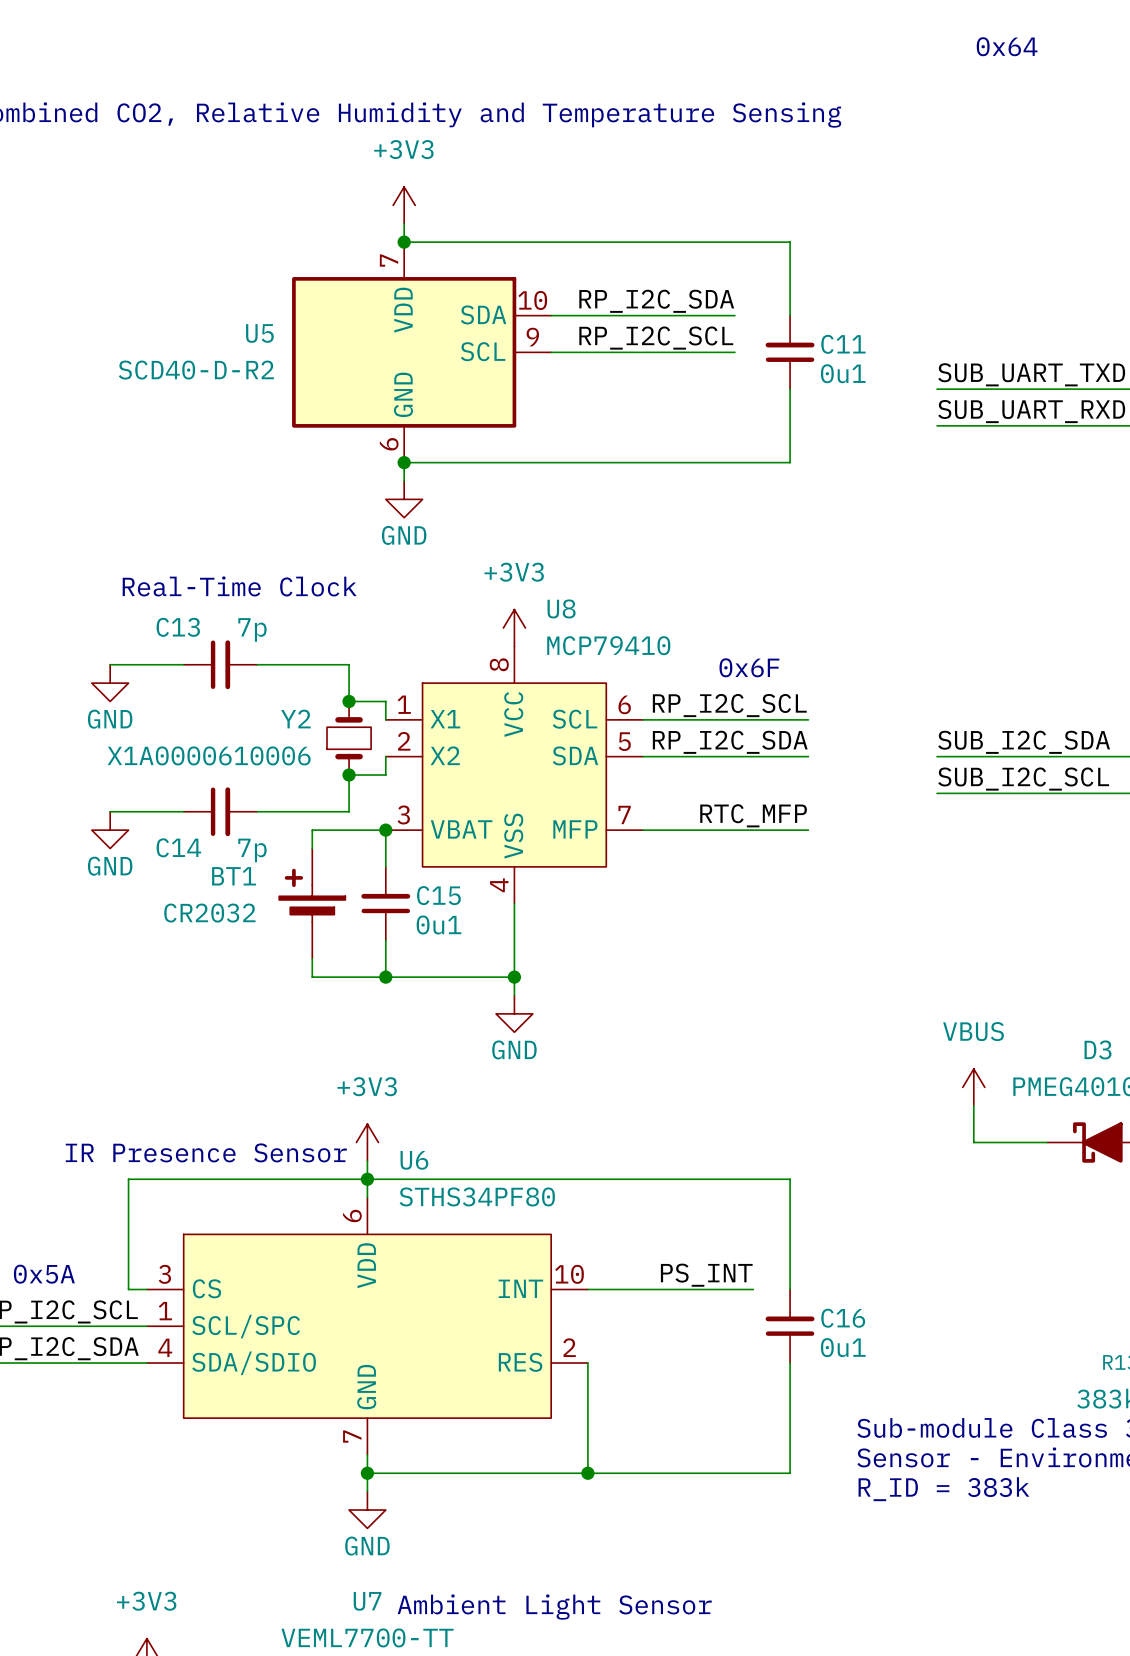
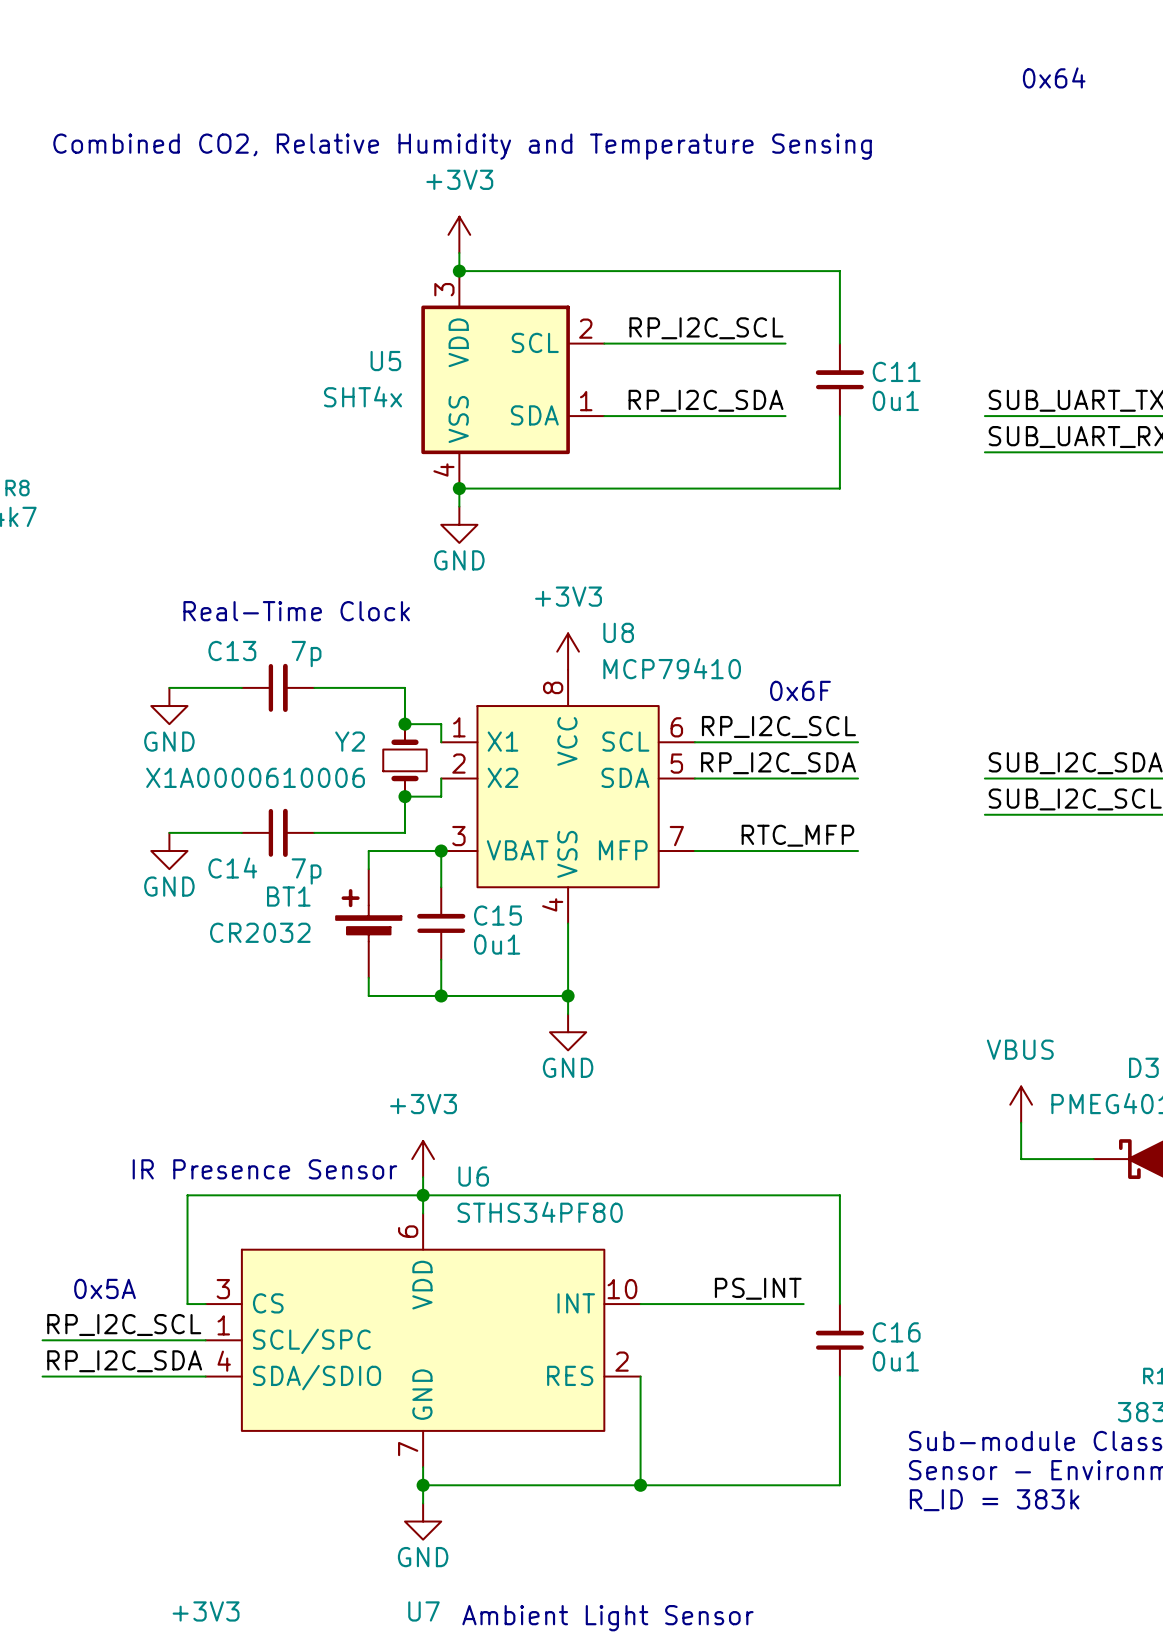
U5 symbol: [292, 242, 552, 463] -> [421, 271, 605, 489]
label: RP_I2C_SDA (656, 301) -> RP_I2C_SCL (706, 328)
U5 name position: U5 (259, 333) -> U5 (385, 361)
label: RP_I2C_SCL (656, 338) -> RP_I2C_SDA (706, 400)
wire: (551, 352) (734, 352) -> (604, 416) (785, 416)
U5 value: SCD40-D-R2 (196, 370) -> SHT4x (363, 396)

